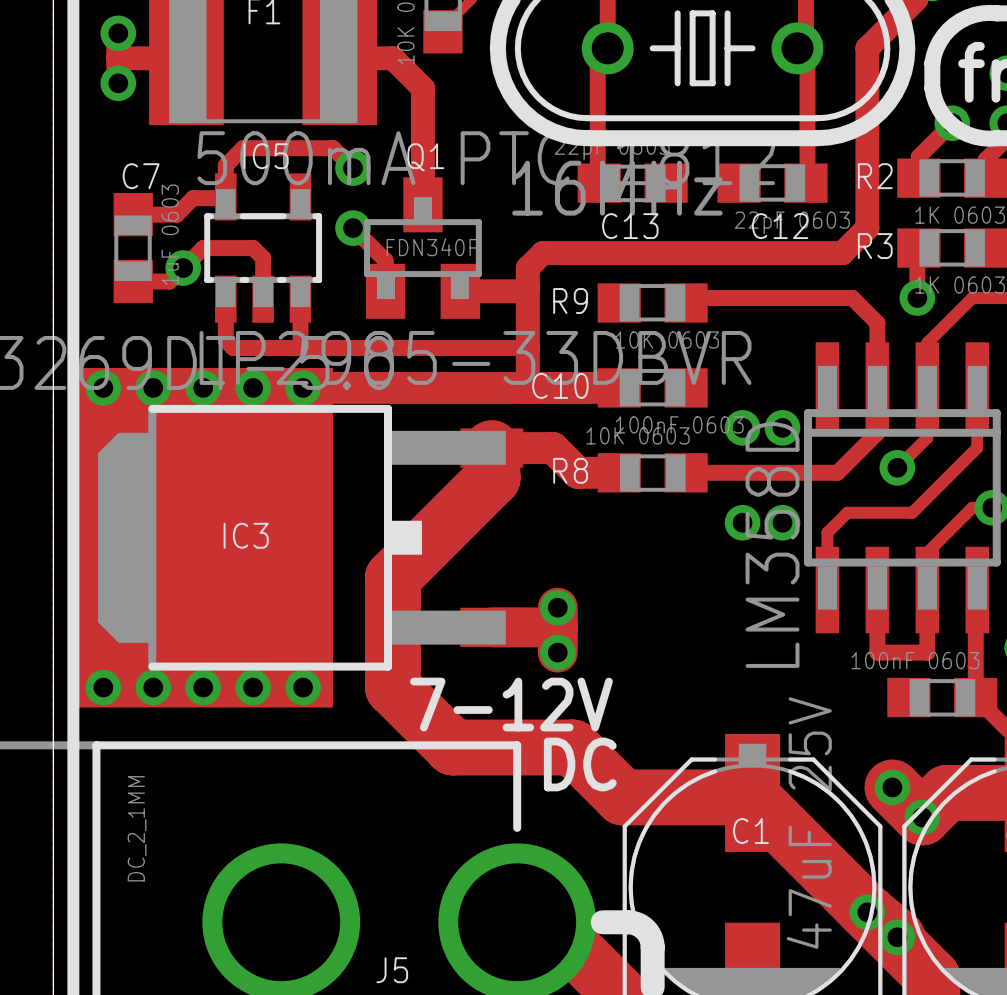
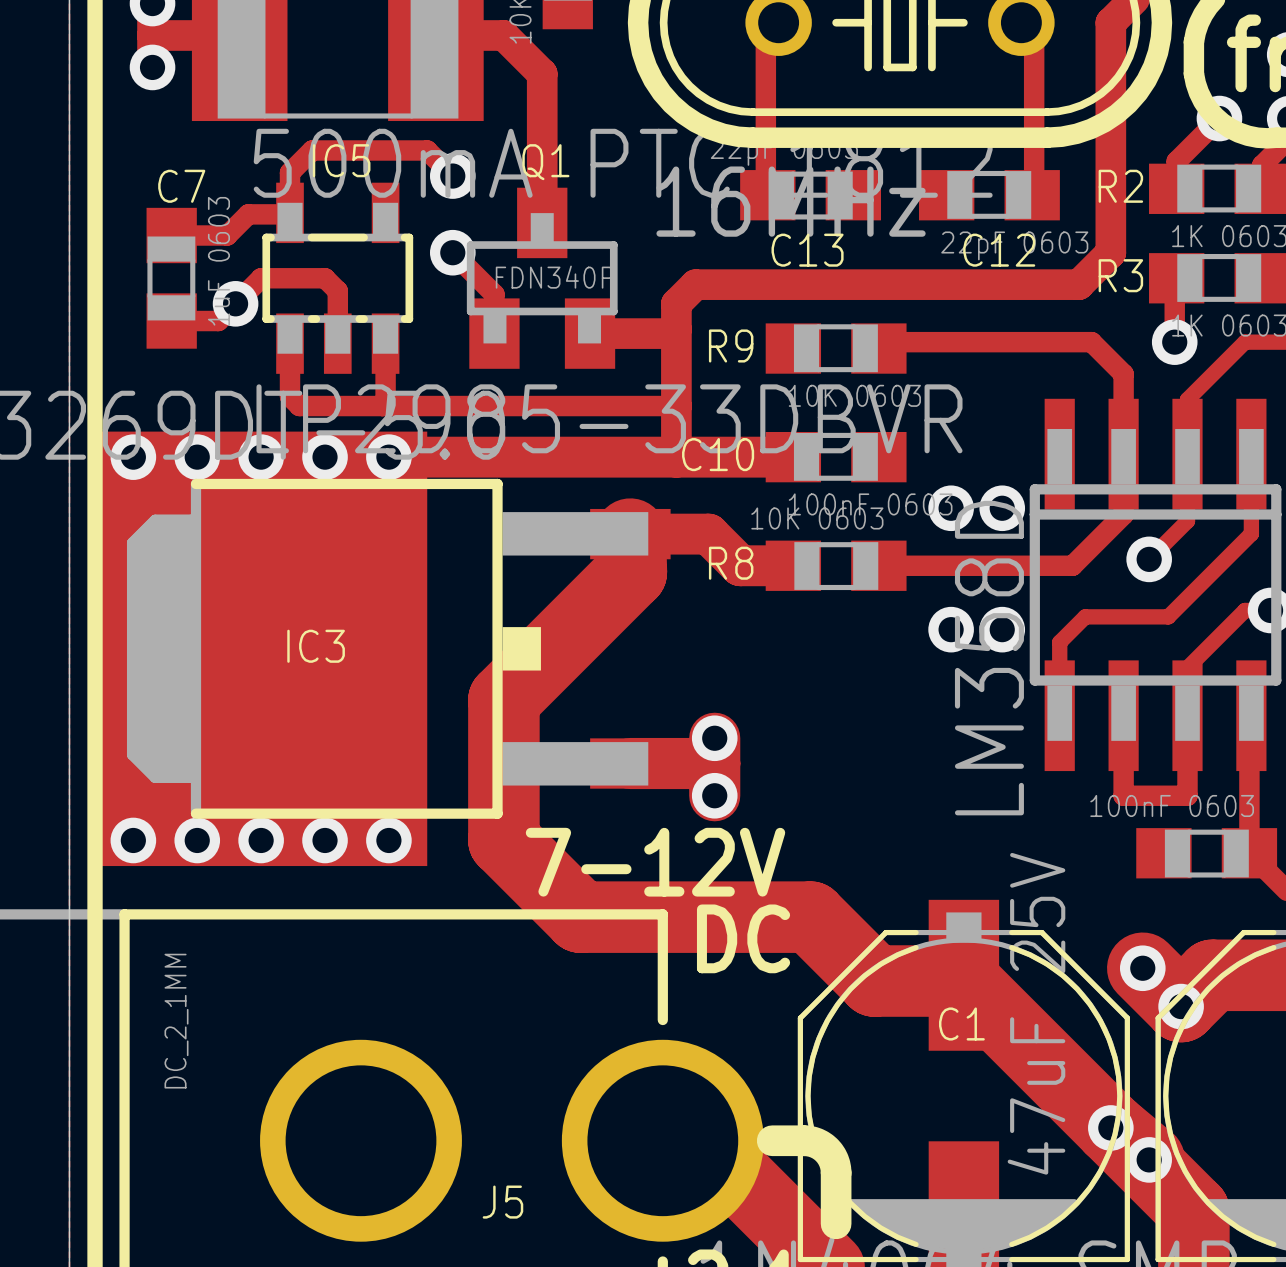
track: (572, 747) (622, 797) (682, 797) -> (733, 917) (810, 917) (874, 981)

